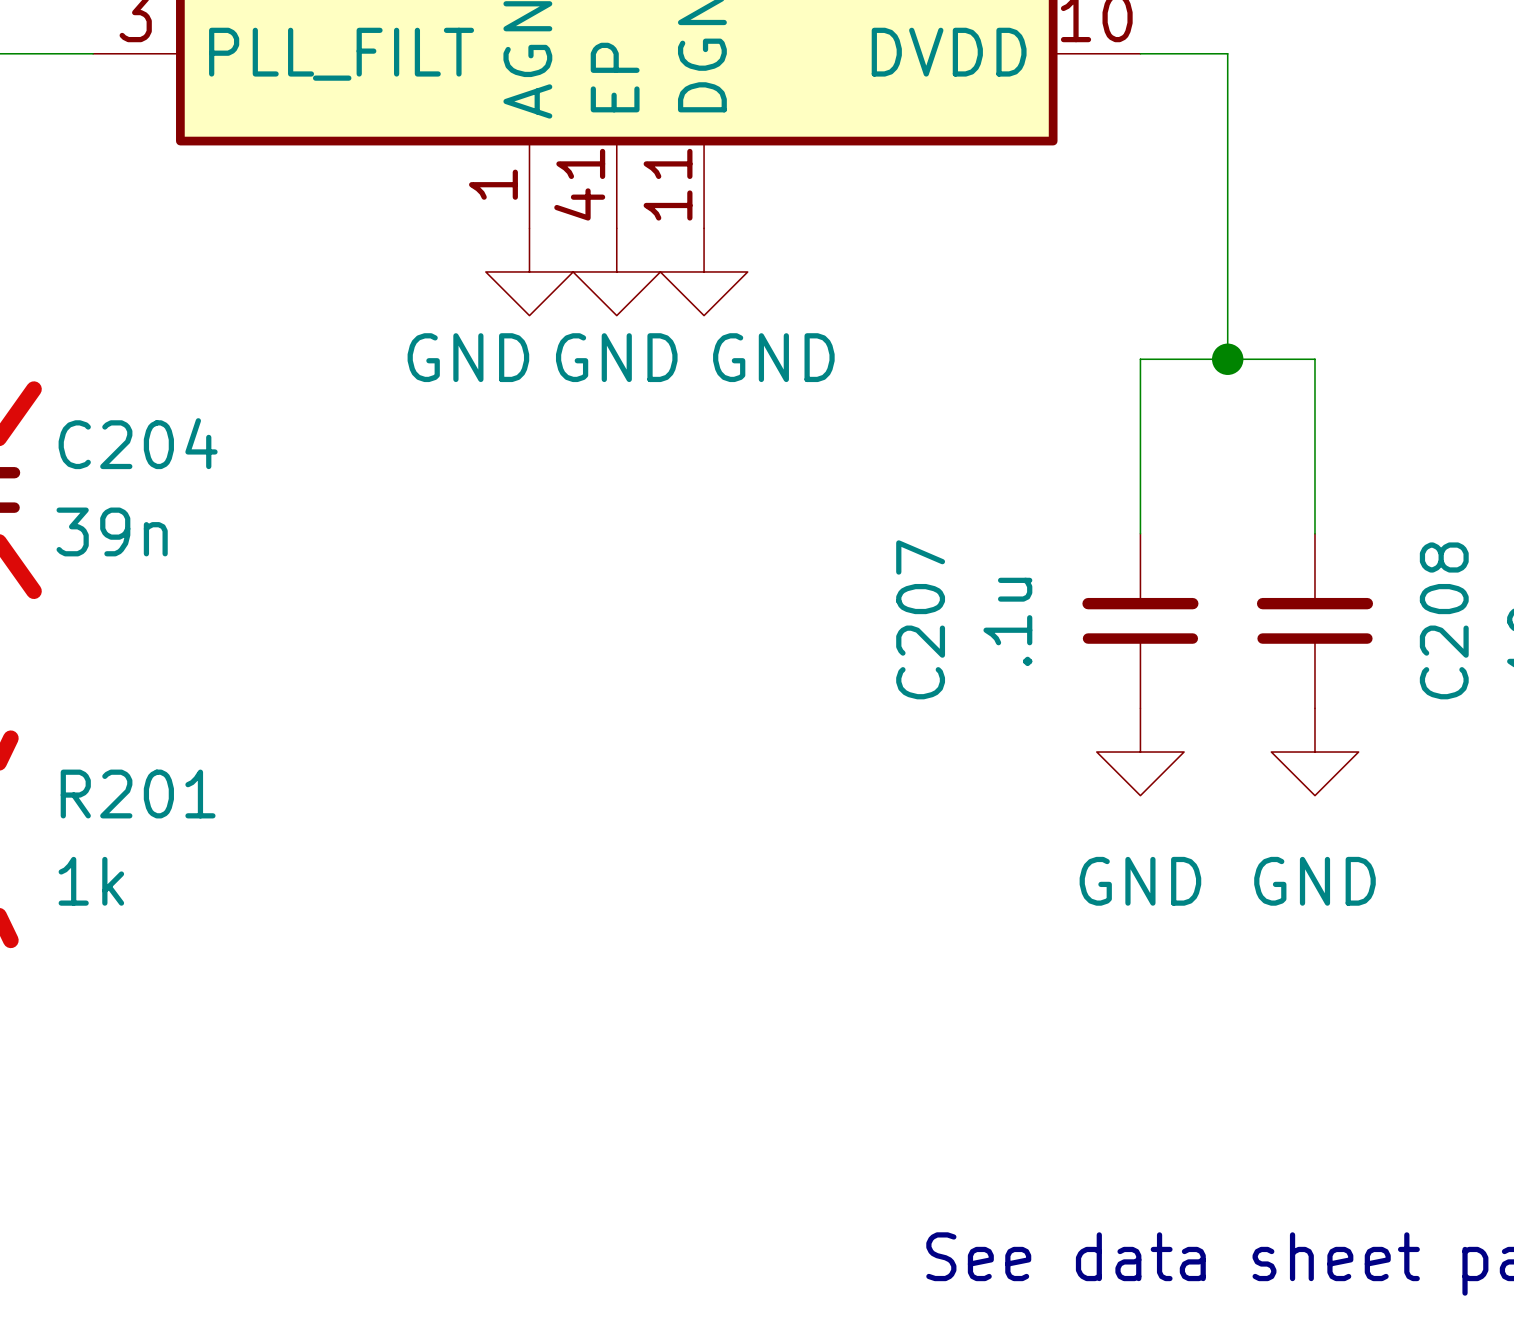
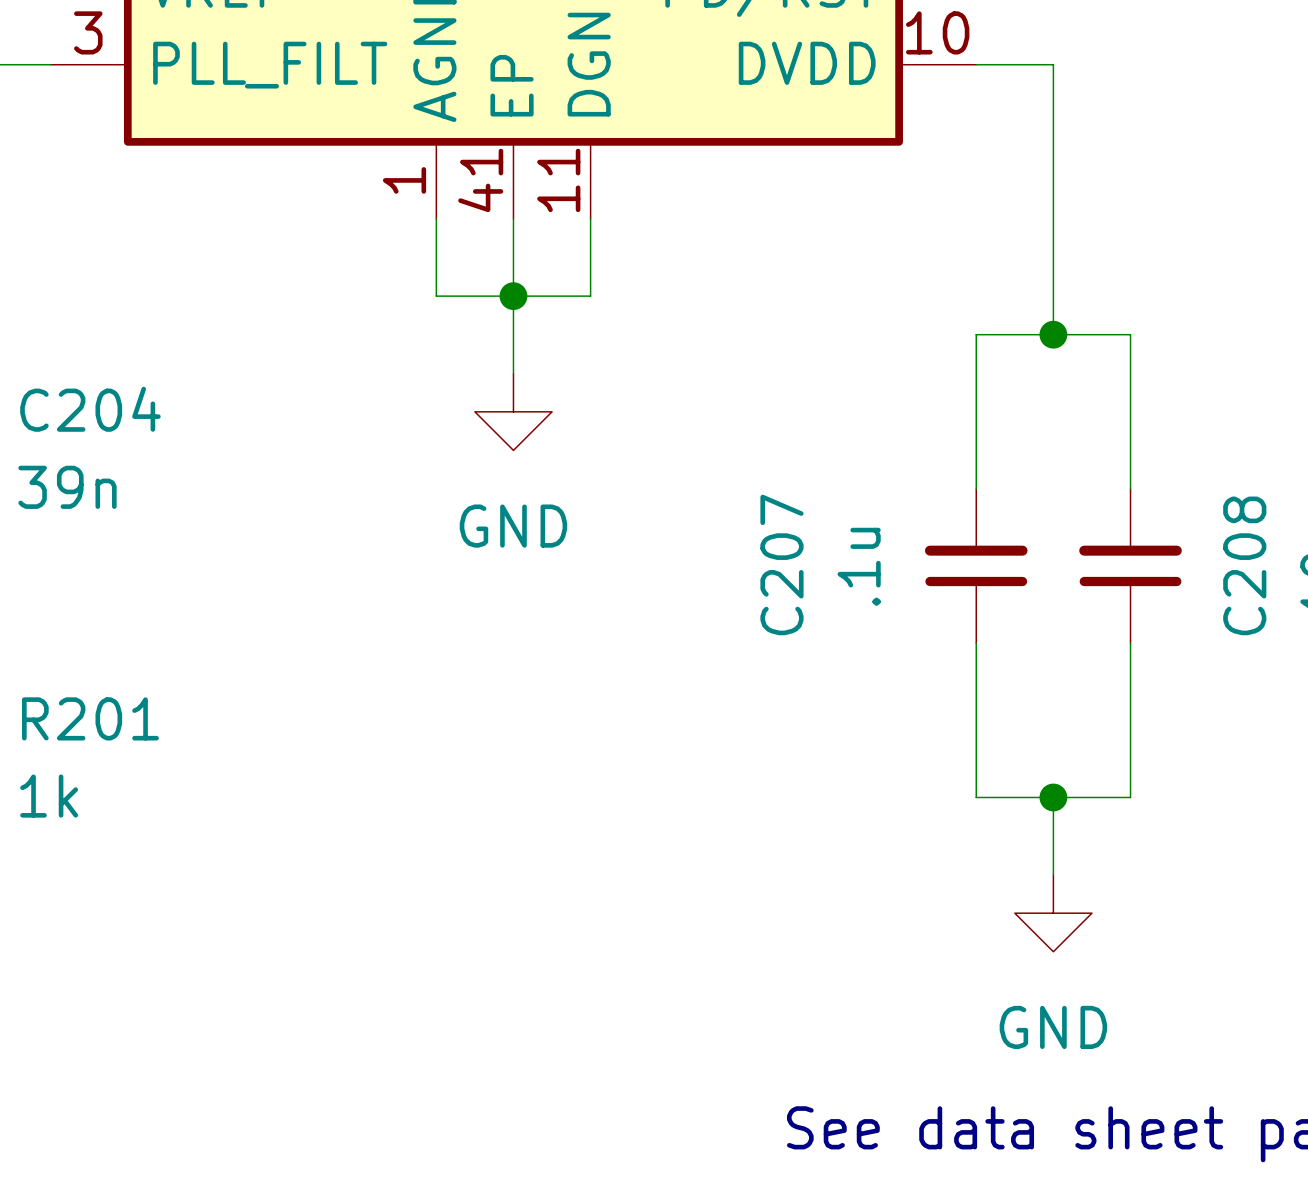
wire: none -> (436, 218) (436, 296) (590, 296) (590, 218)
wire: none -> (513, 218) (513, 373)
power symbol: GND (529, 271) -> none
power symbol: GND (616, 271) -> none
power symbol: GND (704, 271) -> none
junction: none -> (513, 296)
power symbol: none -> GND (513, 411)
wire: none -> (976, 643) (976, 797) (1130, 797) (1130, 643)
power symbol: GND (1140, 752) -> none
power symbol: GND (1314, 752) -> none
wire: none -> (1053, 797) (1053, 874)
junction: none -> (1053, 797)
power symbol: none -> GND (1053, 913)

